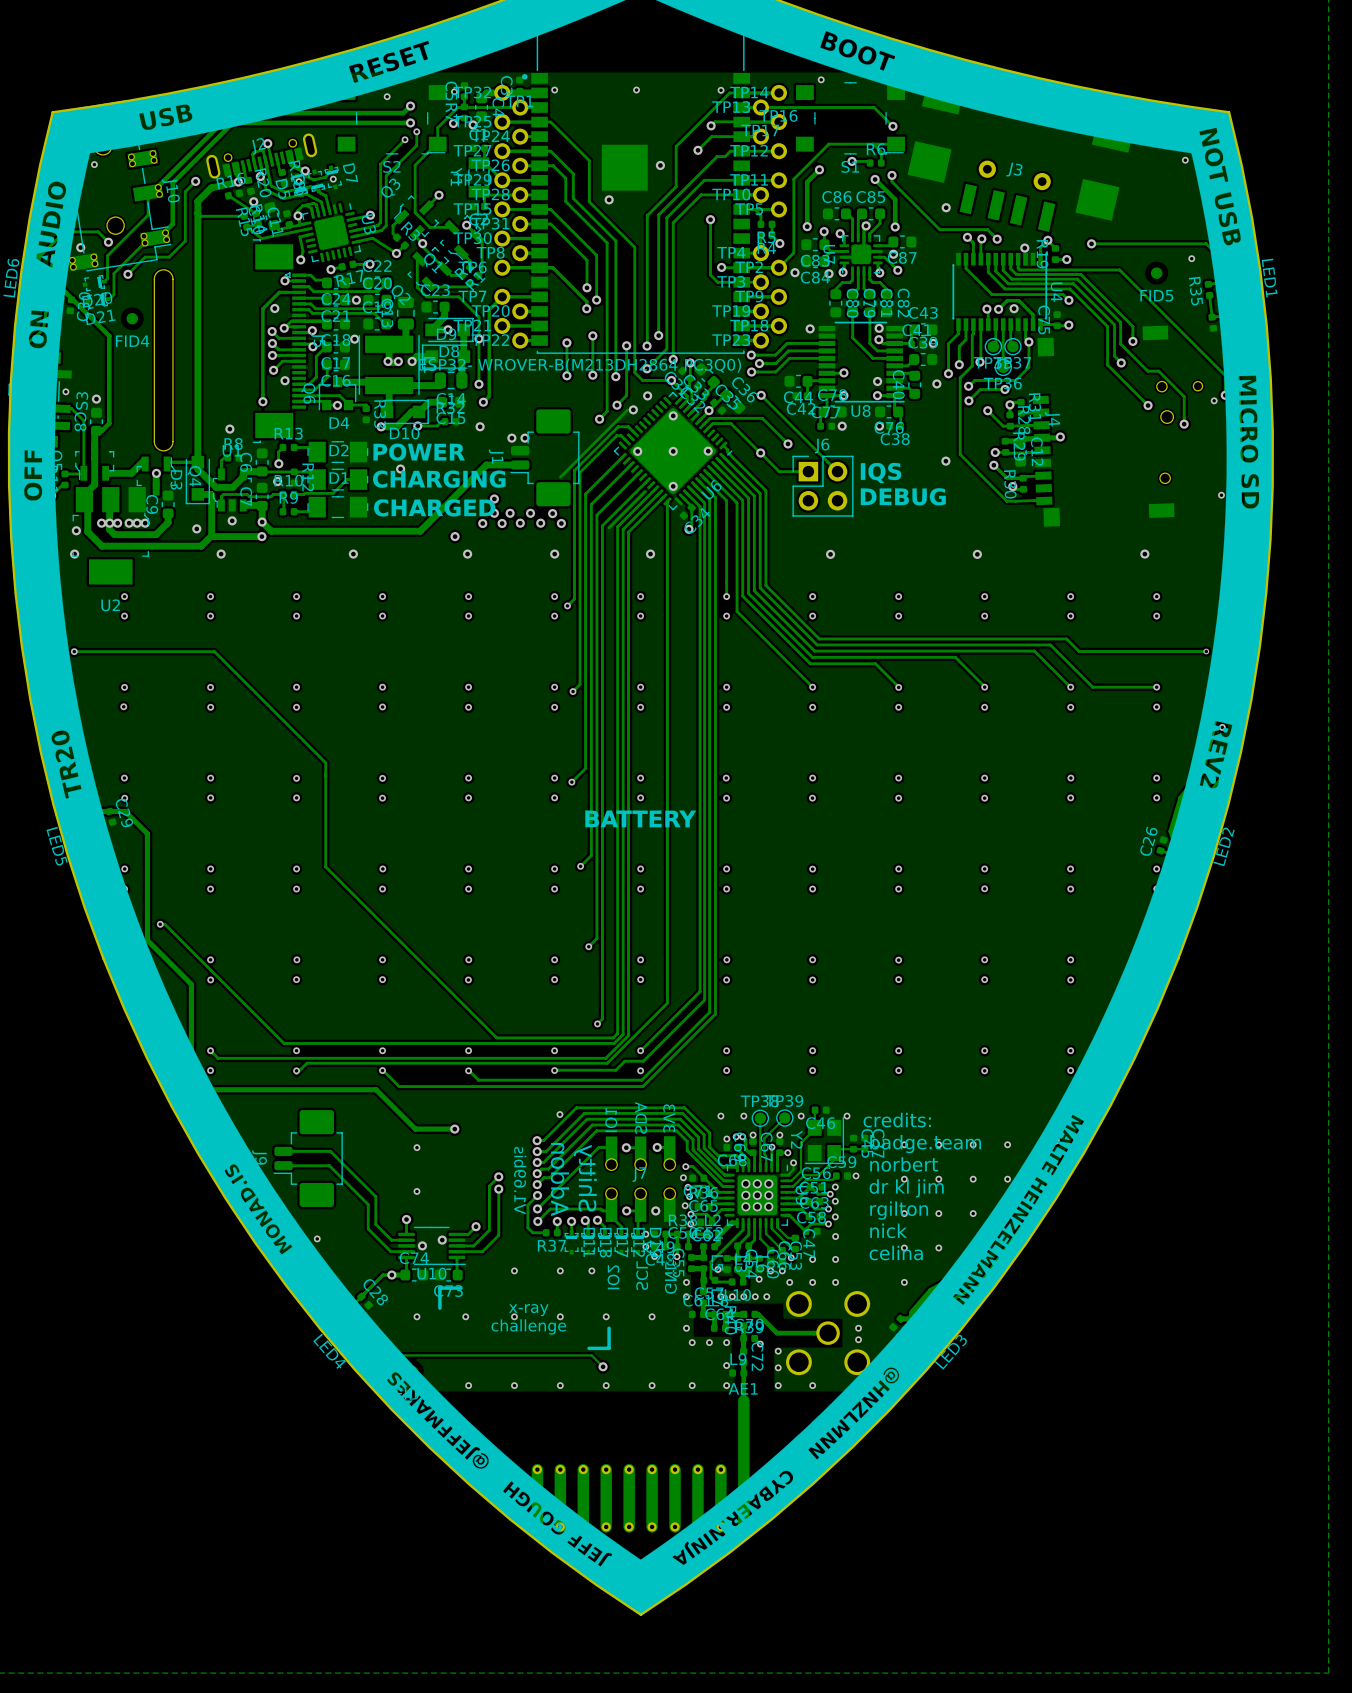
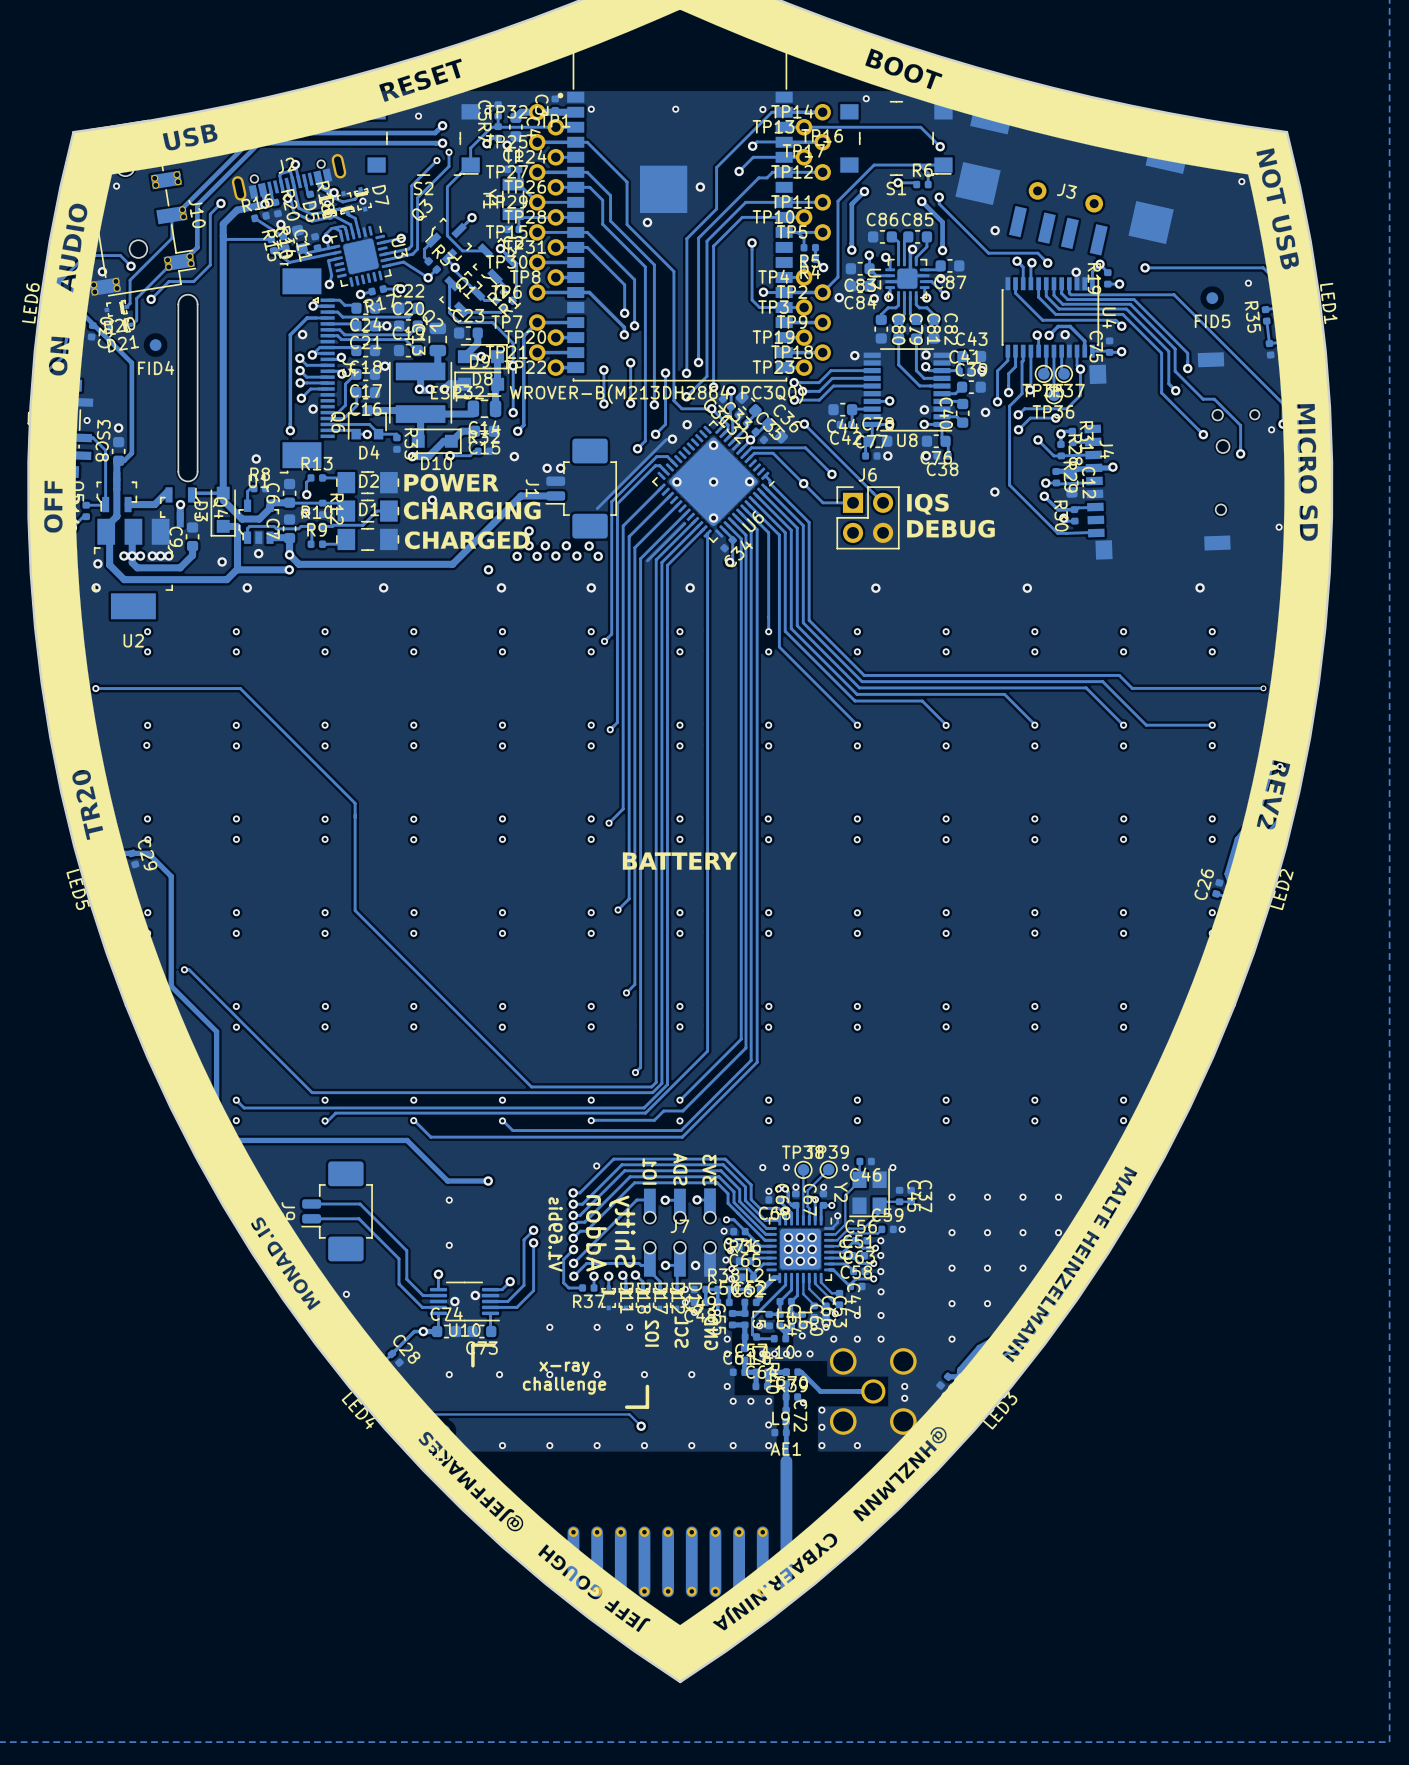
text: credits: (897, 1120) -> none
text: badge.team (925, 1144) -> none
text: norbert (904, 1164) -> none
text: dr kl jim (906, 1188) -> none
text: rgilton (899, 1210) -> none
text: nick (888, 1230) -> none
text: celina (896, 1253) -> none

